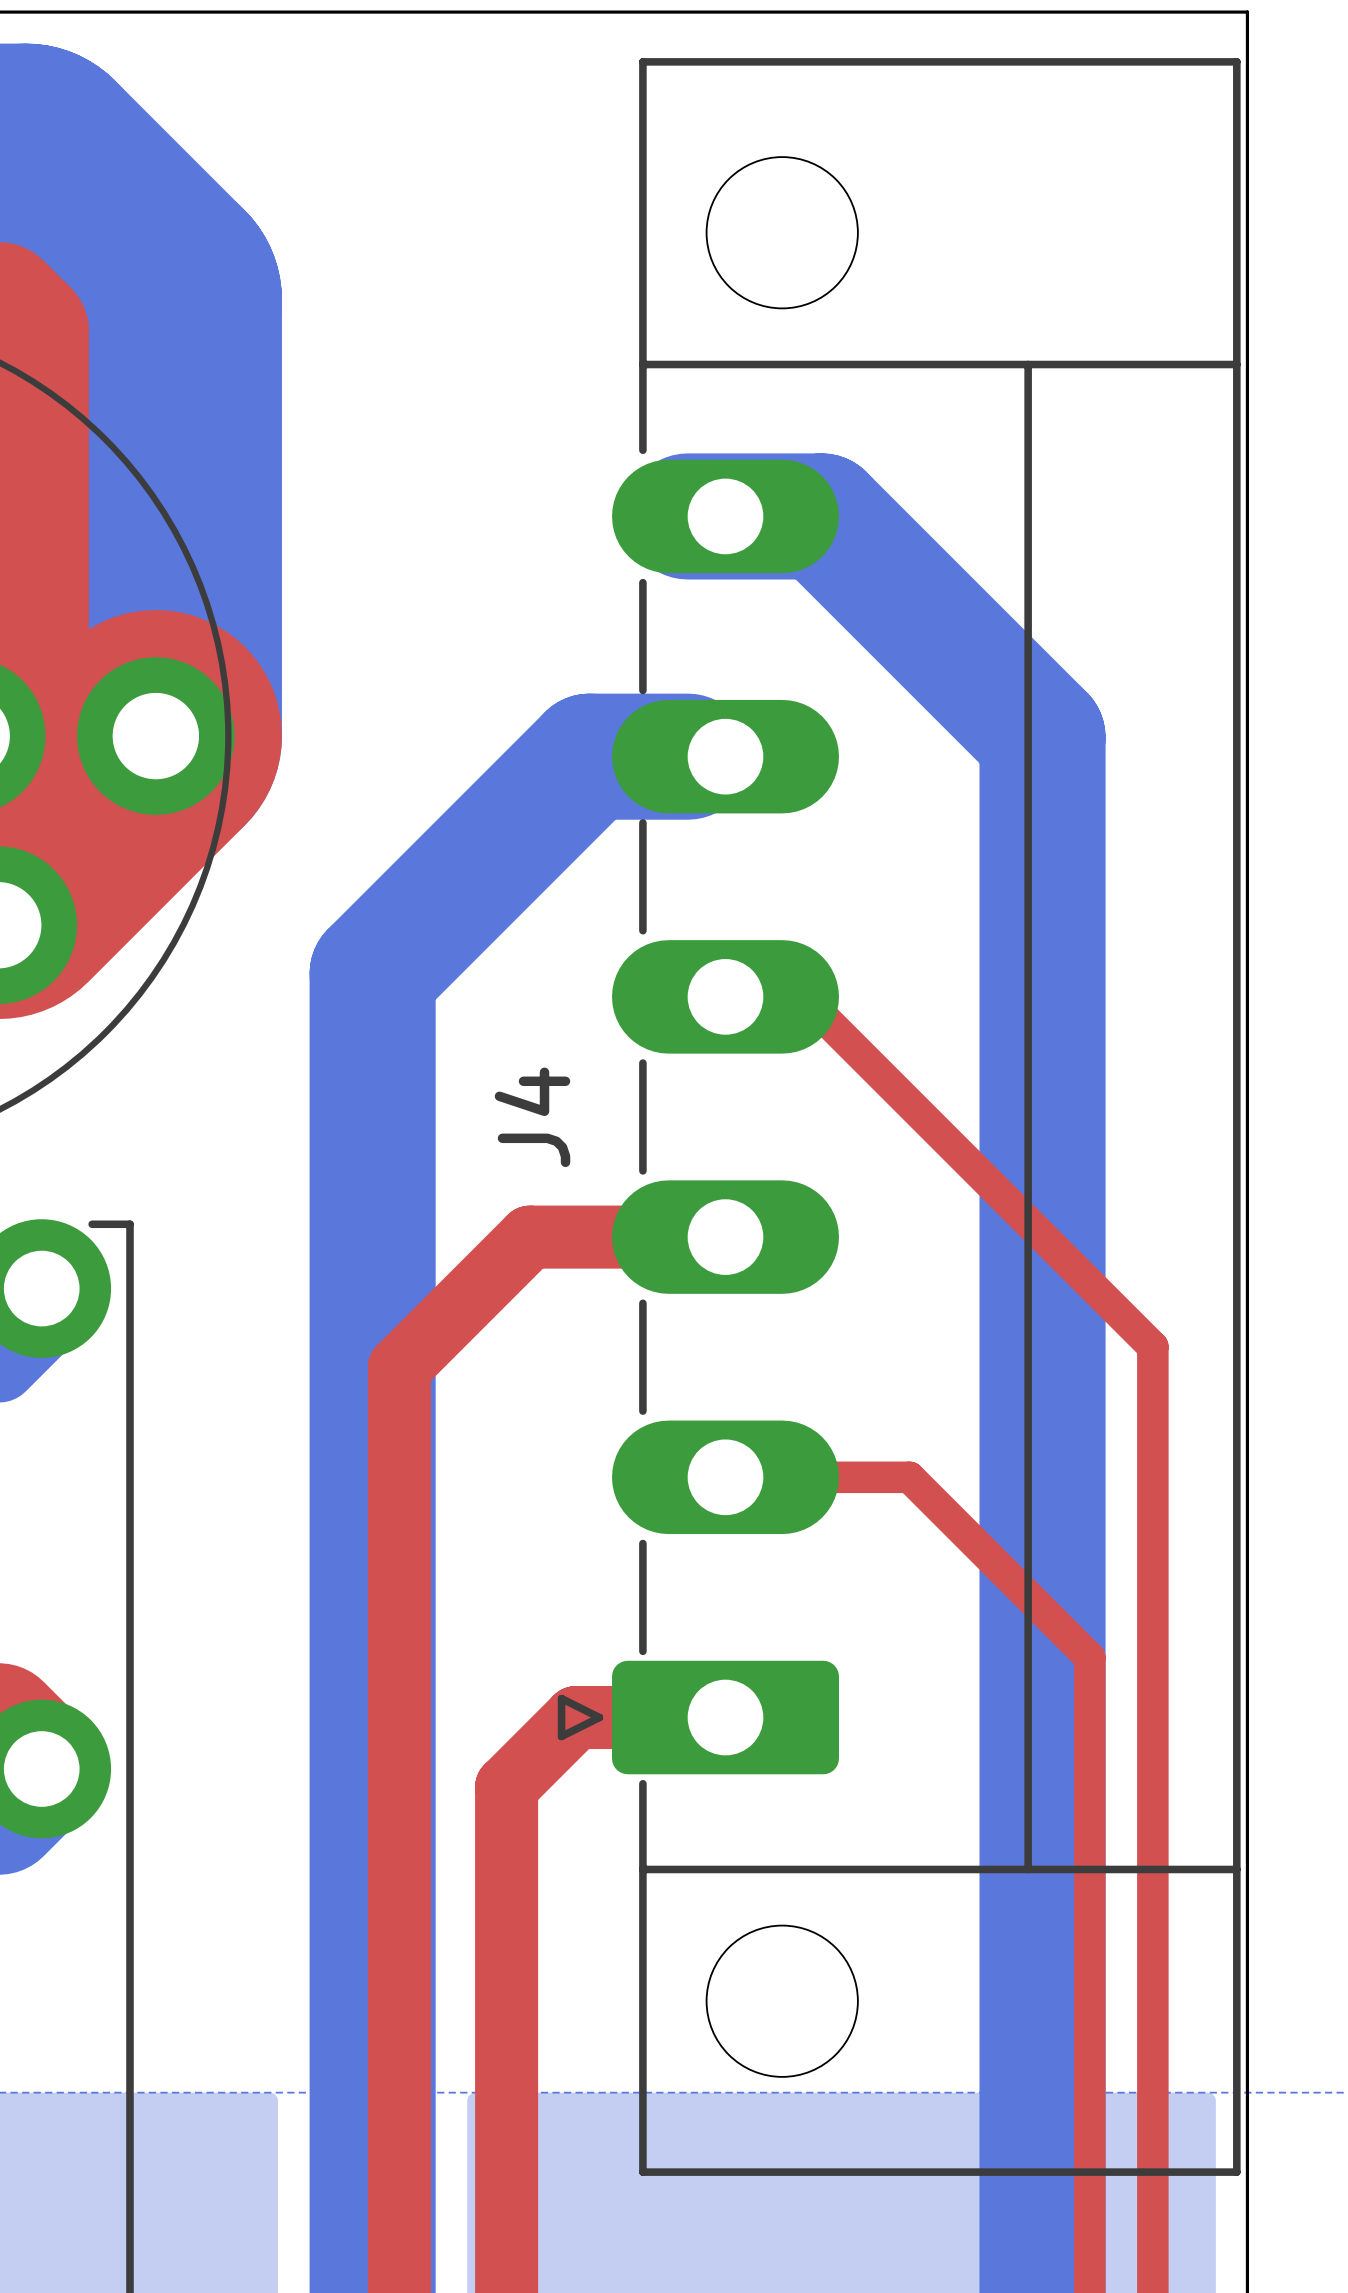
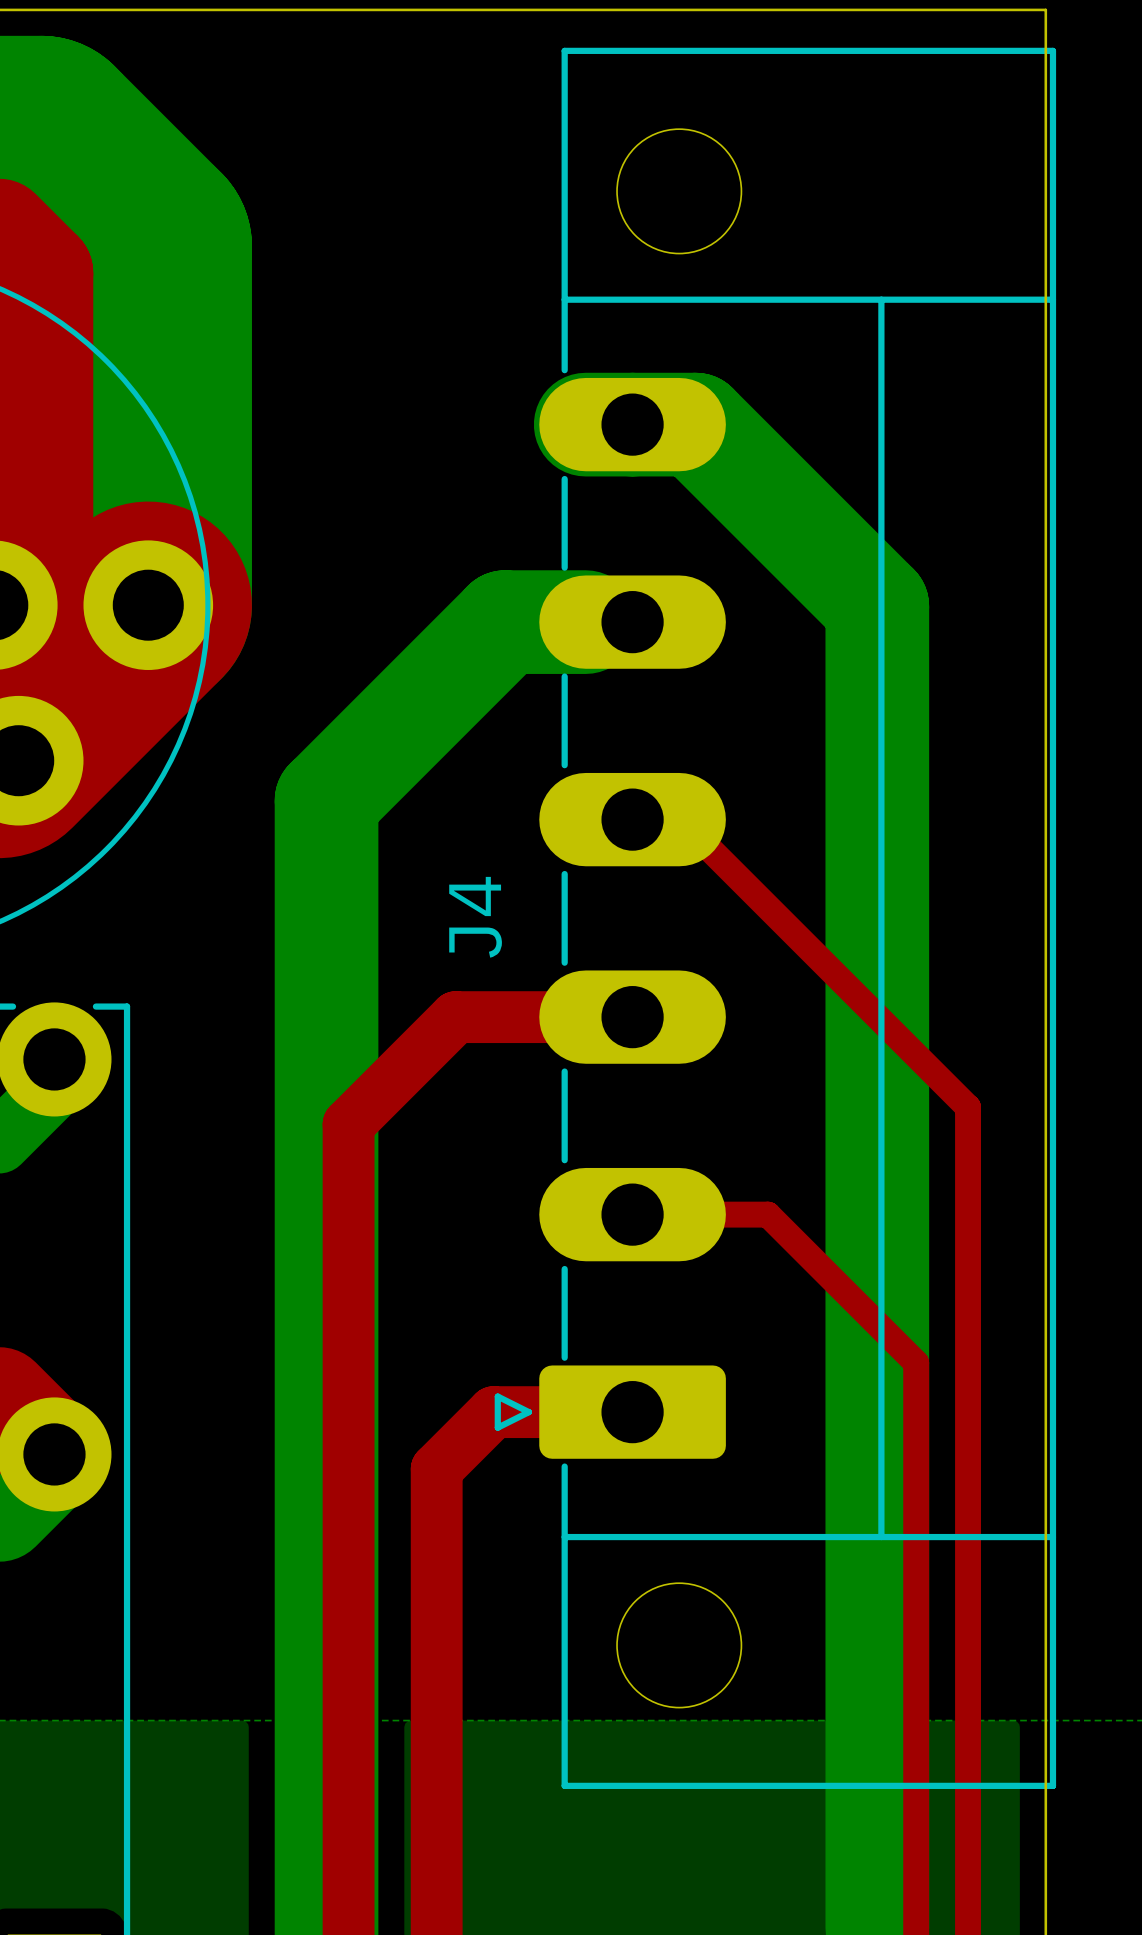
J4 position: (899, 1116) -> (775, 918)

